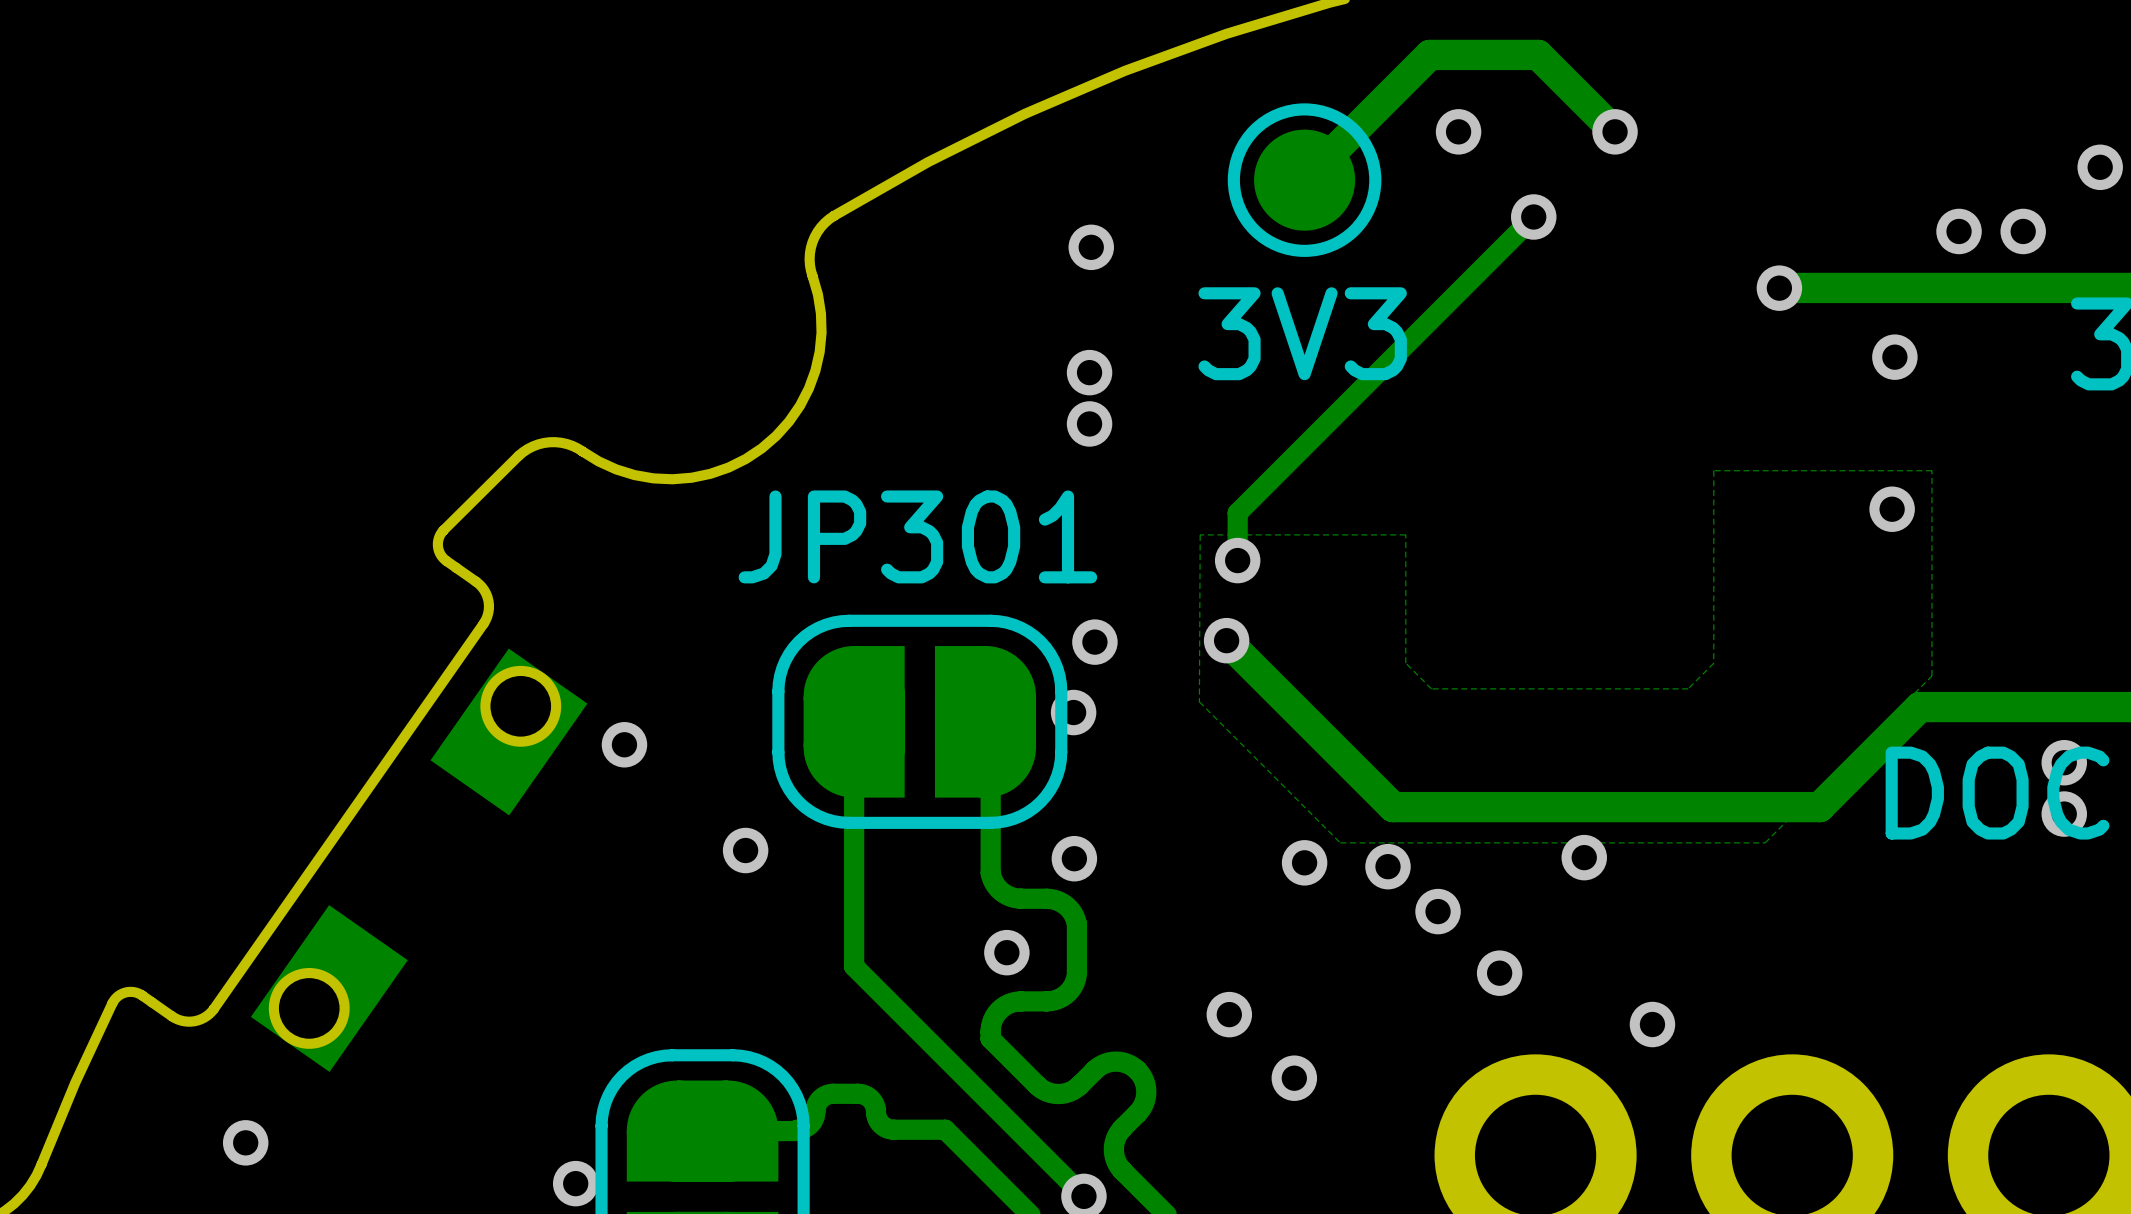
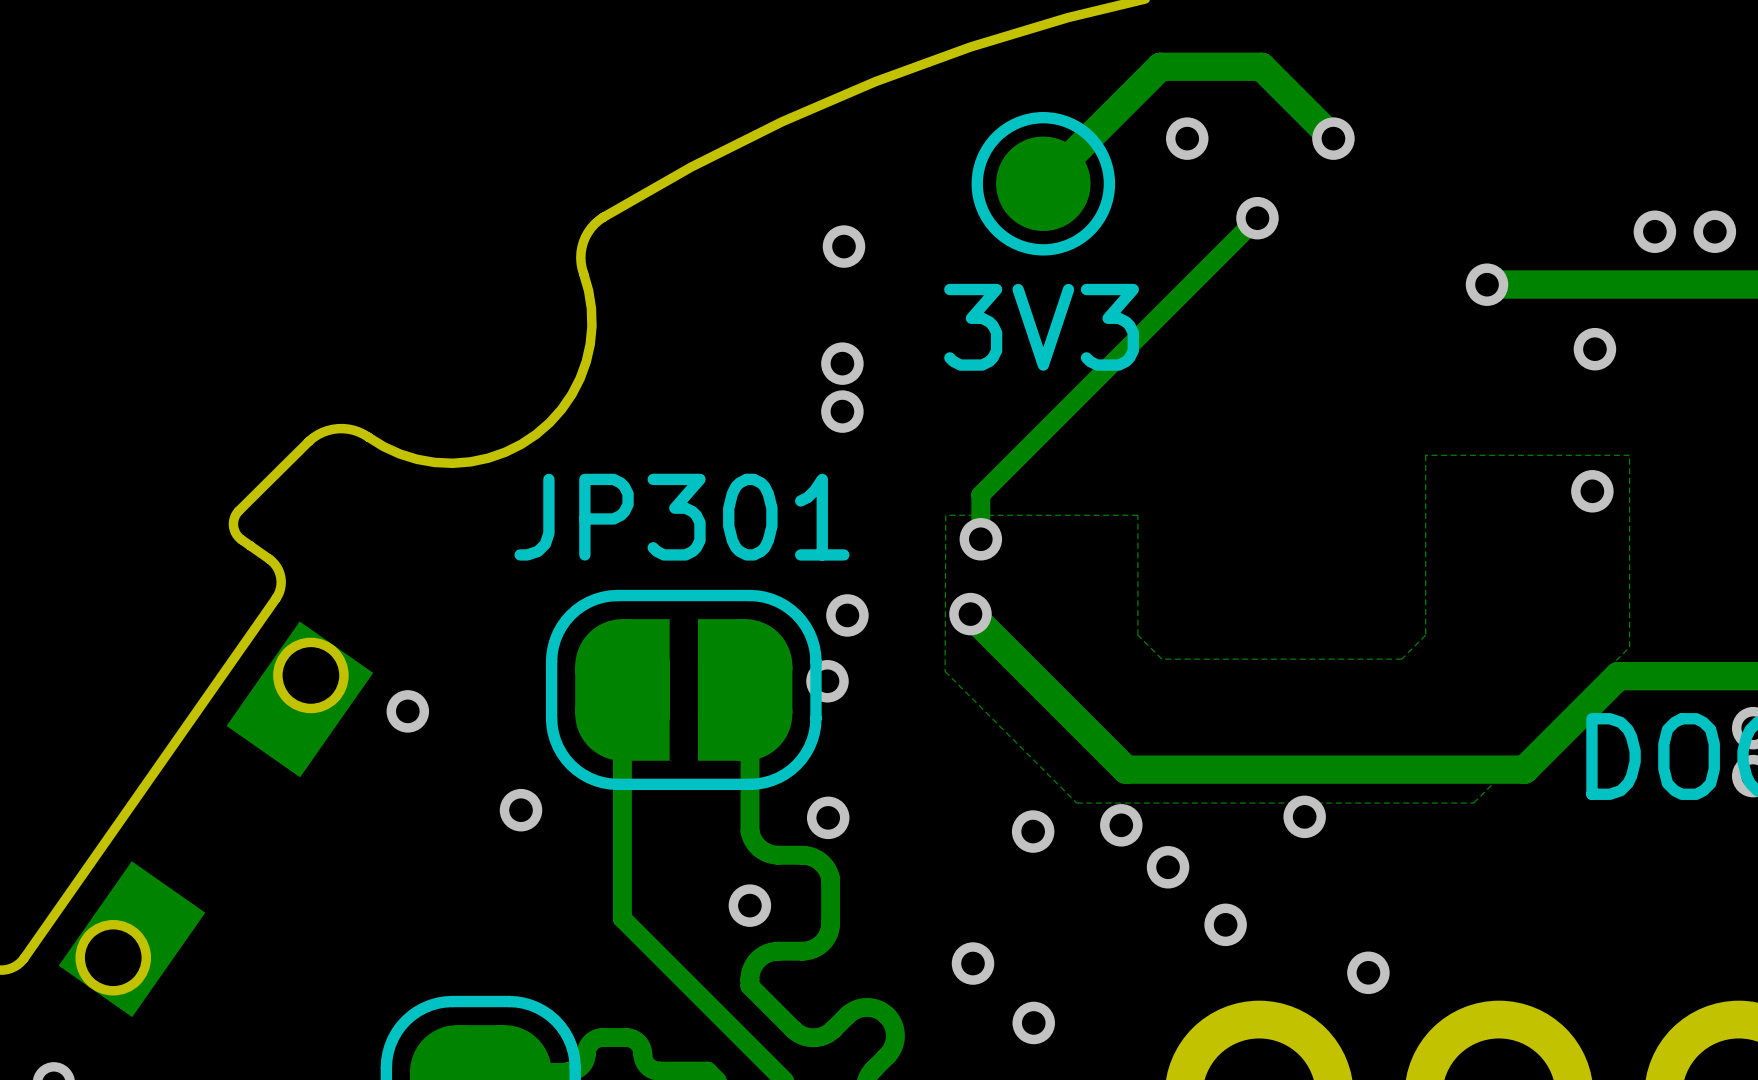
via position: (1304, 862) -> (1033, 831)
via position: (1006, 952) -> (749, 905)

